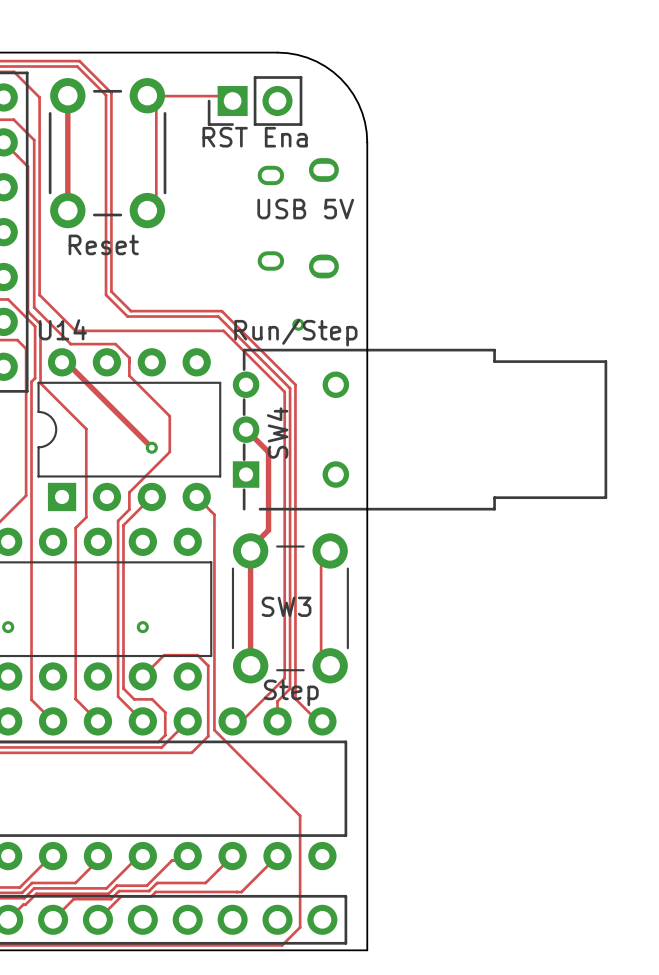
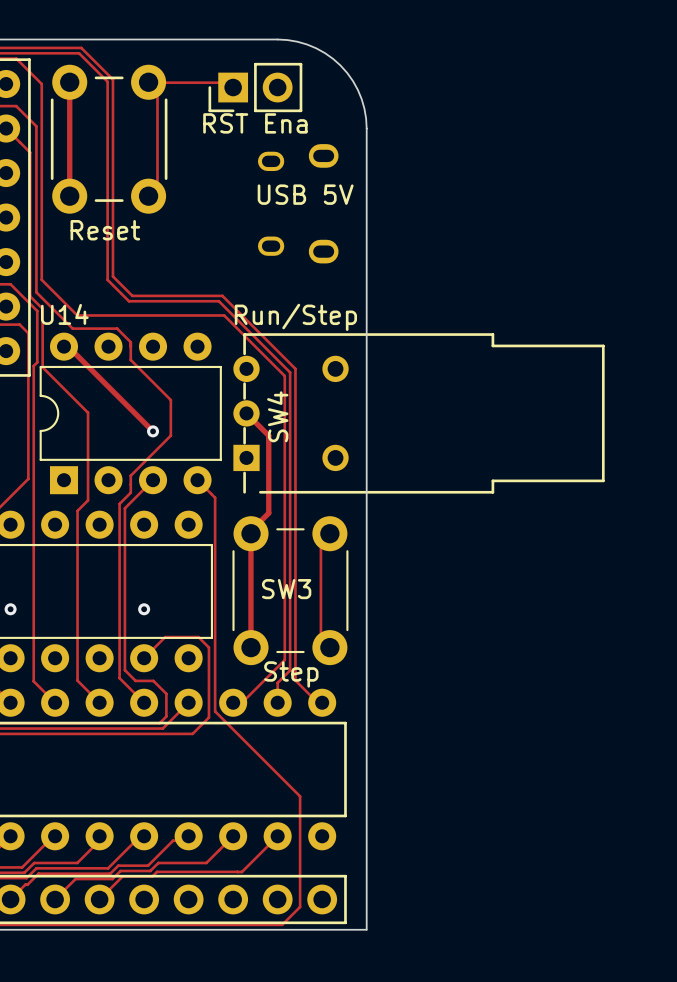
via: (298, 324) -> none

